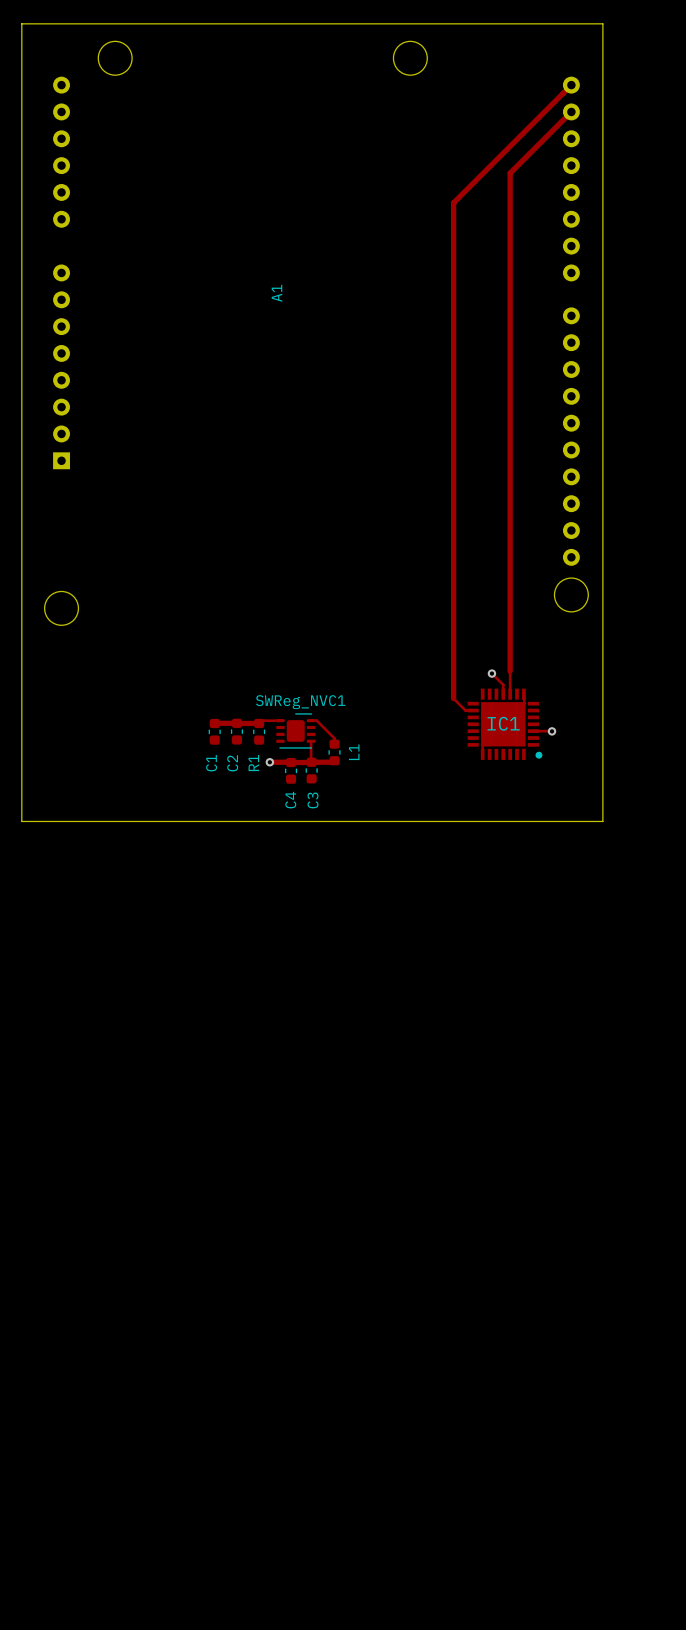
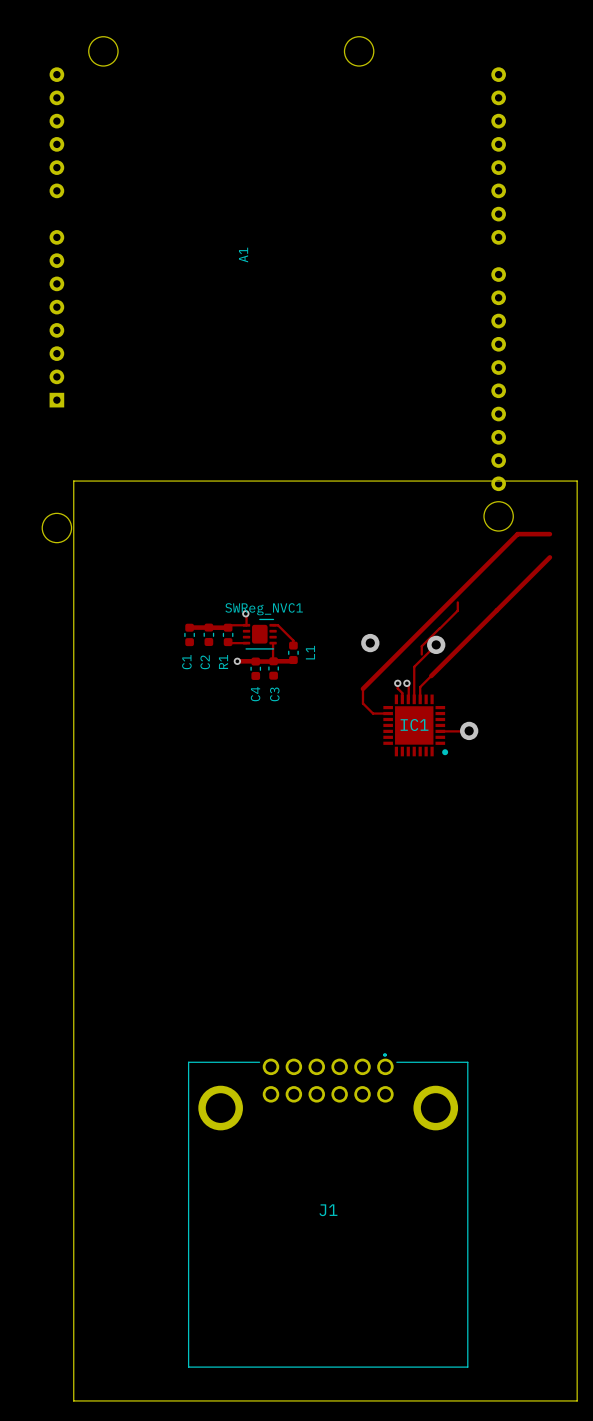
board edge: (21, 23) (602, 23) (602, 821) (21, 821) (21, 23) -> none
track: (571, 85) (453, 202) (453, 698) (465, 710) (473, 710) -> none
track: (571, 111) (510, 173) (510, 694) -> none
board edge: none -> (73, 481) (577, 481) (577, 1400) (73, 1400) (73, 481)
track: none -> (549, 534) (517, 534) (362, 688) (362, 703) (373, 713) (388, 713)
track: none -> (549, 557) (431, 676)
track: (491, 673) (503, 684) (503, 694) -> none
via: (491, 673) -> none
track: none -> (245, 613) (246, 625)
via: none -> (245, 613)
IC1 position: (505, 724) -> (415, 725)
track: (533, 731) (552, 731) -> none
via: (552, 731) -> none
track: none -> (228, 642) (246, 643)
via: none -> (370, 643)
track: none -> (436, 644) (414, 666) (414, 699)
via: none -> (436, 644)
track: none -> (435, 671) (420, 687) (420, 699)
track: none -> (397, 683) (397, 688) (402, 693) (402, 699)
via: none -> (397, 683)
track: none -> (406, 683) (408, 685) (408, 699)
via: none -> (406, 683)
track: none -> (469, 730) (440, 731)
via: none -> (469, 730)
J1: none -> (328, 1210)

